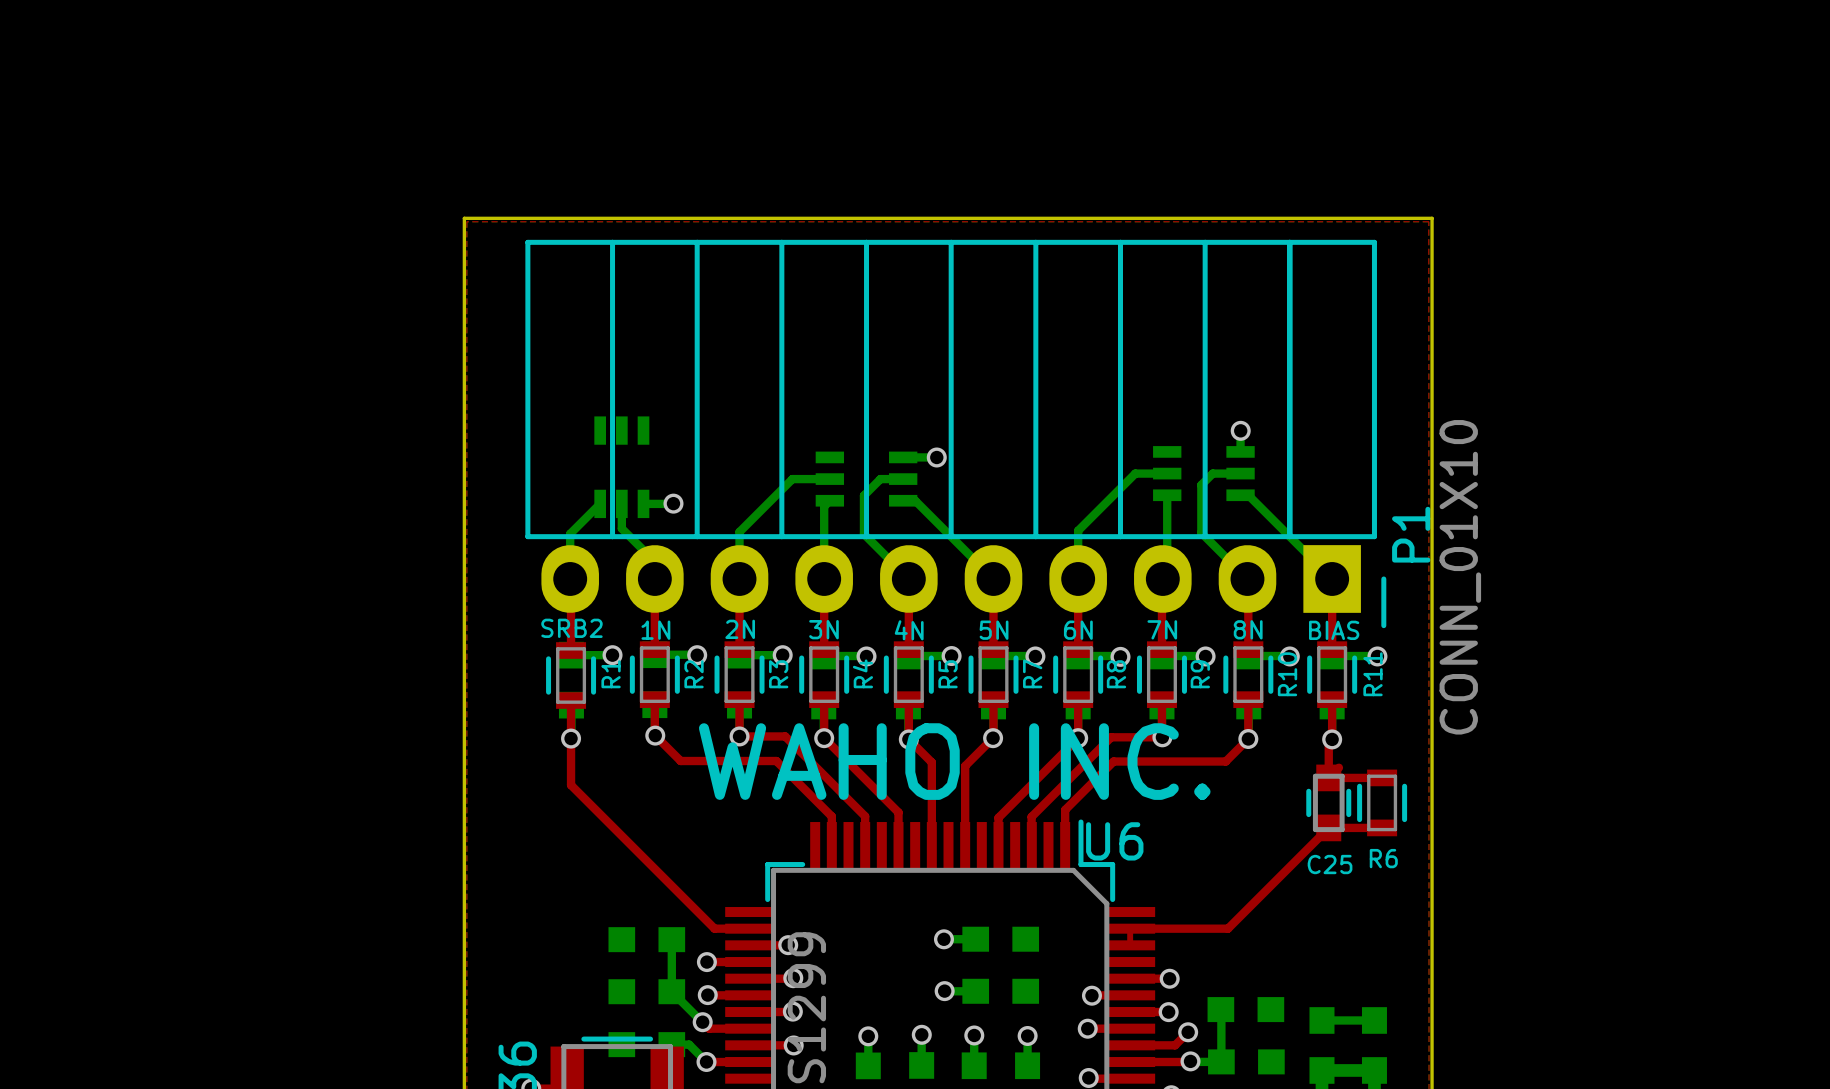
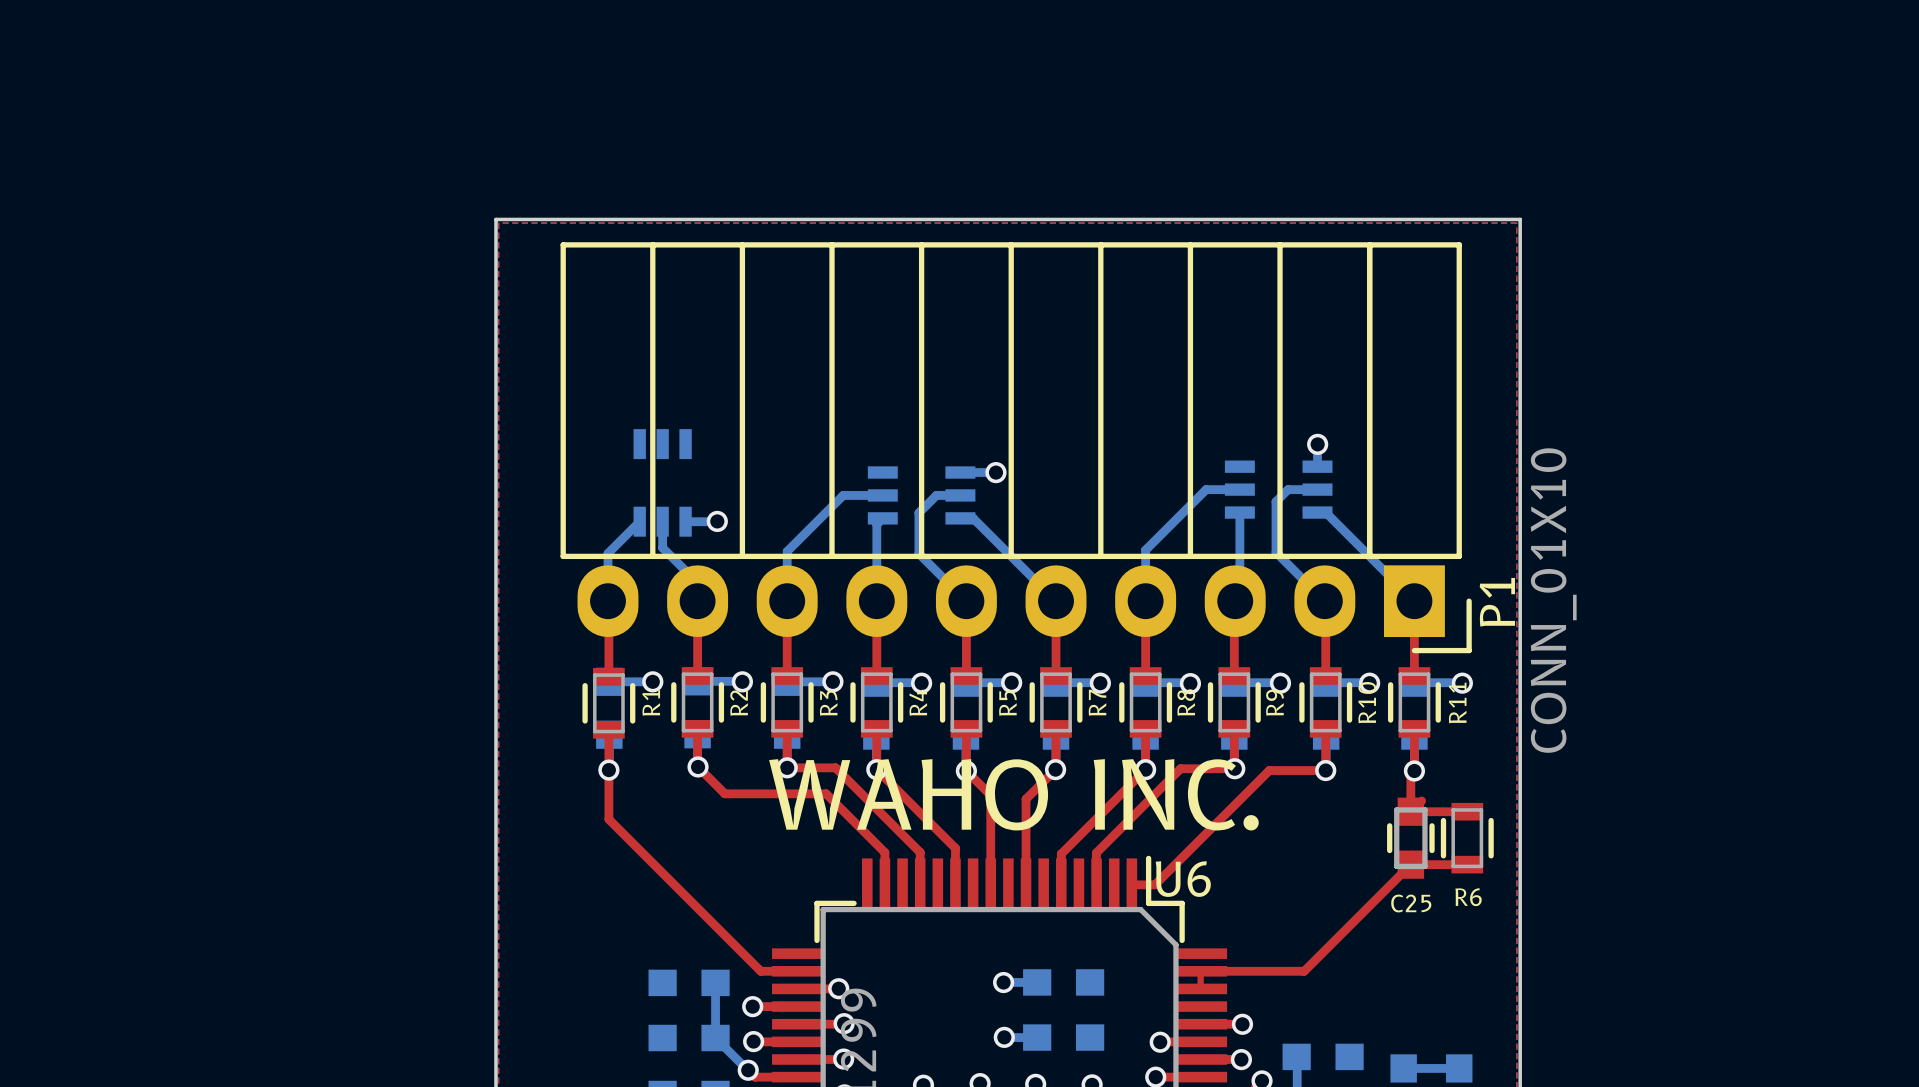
P1 footprint: [525, 239, 1387, 629] -> [560, 242, 1472, 654]
text: SRB2 (571, 628) -> none
text: 2N (740, 629) -> none
text: 3N (823, 629) -> none
text: 7N (1162, 629) -> none
text: 8N (1248, 629) -> none
text: 1N (655, 630) -> none
text: 4N (909, 630) -> none
text: 5N (994, 630) -> none
text: 6N (1078, 630) -> none
text: BIAS (1334, 630) -> none
top track: (1248, 739) (1225, 761) (1113, 761) (1065, 809) (1065, 847) -> (1325, 770) (1269, 770) (1154, 884) (1131, 884)

